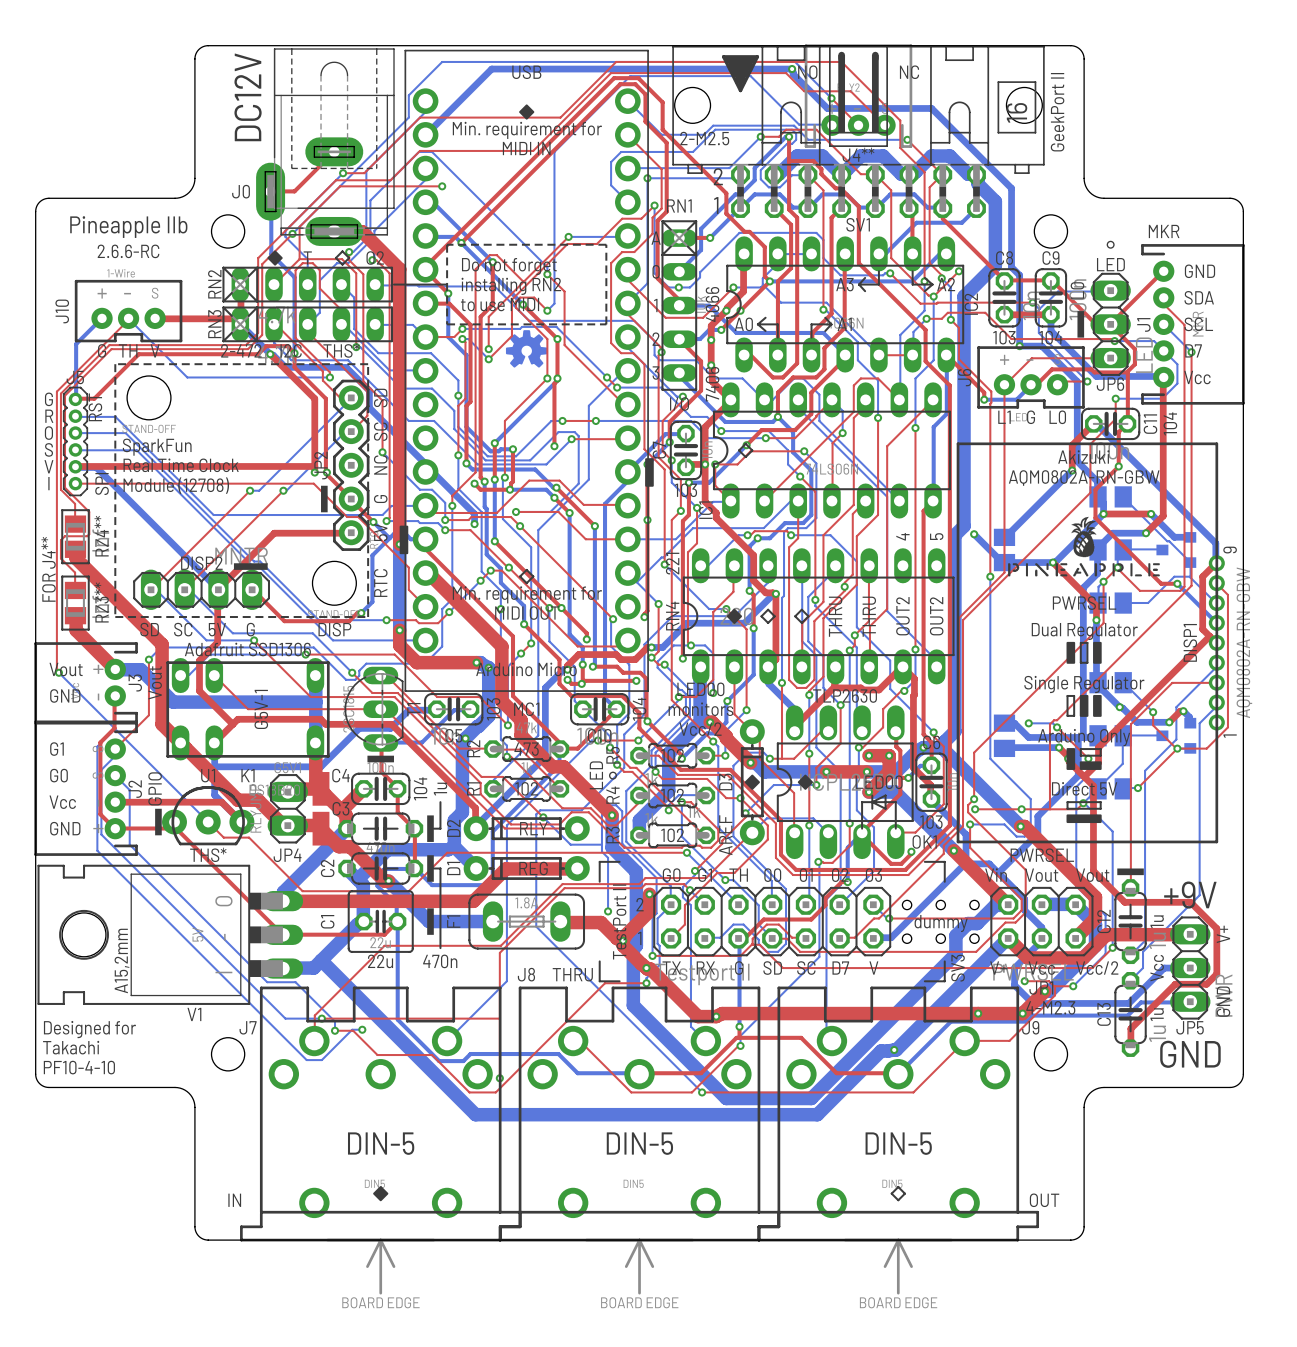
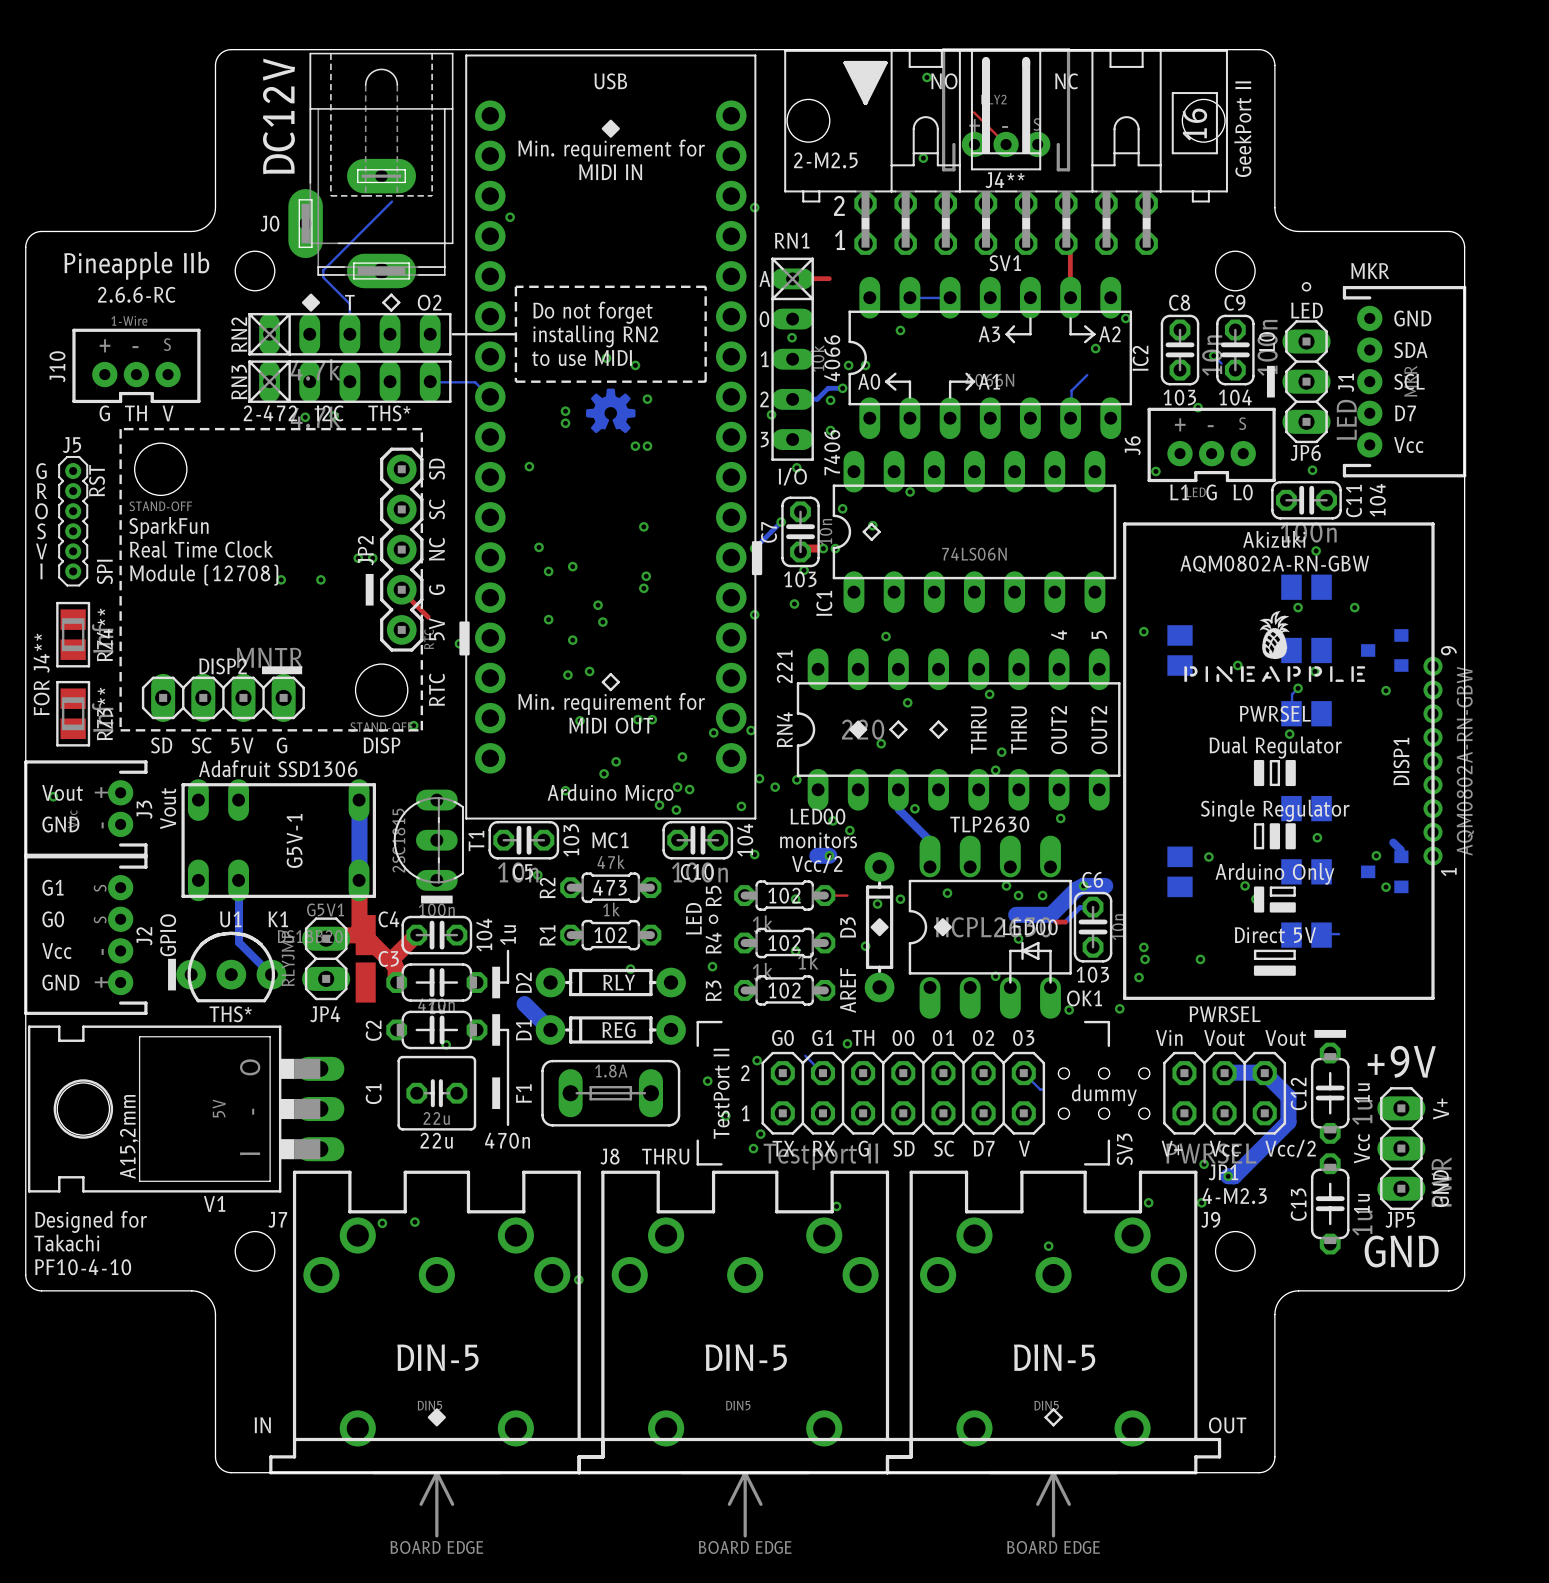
bottom track: (831, 98) (795, 61) (442, 61) (408, 95) (408, 117) (292, 233) -> none
via: (831, 98) -> none
bottom track: (425, 101) (425, 112) (366, 171) (366, 238) (353, 252) (349, 252) -> none
bottom track: (627, 101) (661, 134) (704, 134) (713, 125) (794, 125) (808, 139) (907, 139) -> none
bottom track: (831, 125) (799, 124) (750, 76) (630, 76) (554, 151) (554, 303) (547, 310) -> none
top track: (885, 125) (850, 91) (804, 91) (786, 73) (611, 73) (533, 150) (419, 150) (390, 180) (336, 180) (258, 258) (258, 332) (246, 345) (109, 345) (60, 393) (60, 489) (75, 503) (75, 524) -> none
bottom track: (425, 134) (491, 69) (792, 69) (793, 74) (827, 108) (931, 108) (1011, 188) (1011, 267) (1019, 275) (1019, 346) (1041, 346) (1077, 381) (1077, 461) (1097, 481) (1098, 496) (1103, 502) (1103, 514) (1053, 562) (1001, 561) (974, 534) -> none
top track: (627, 134) (661, 169) (661, 208) (652, 217) (652, 233) (634, 252) (622, 252) (611, 263) (611, 343) (621, 353) (633, 353) (644, 364) (644, 449) (664, 469) (664, 564) -> none
top track: (760, 136) (778, 136) (786, 129) (816, 129) (860, 174) (875, 174) (891, 190) (891, 258) (928, 295) (933, 296) (958, 271) -> none
bottom track: (760, 136) (729, 168) (627, 168) -> none
via: (760, 136) -> none
top track: (789, 136) (789, 209) (797, 217) (797, 363) (783, 377) (772, 377) (750, 355) (744, 355) -> none
bottom track: (789, 136) (786, 136) (754, 168) (754, 180) (740, 194) (735, 194) (701, 228) (701, 250) (679, 271) -> none
top track: (907, 139) (942, 174) (929, 187) (929, 263) (941, 275) (941, 278) -> none
via: (907, 139) -> none
top track: (334, 151) (294, 191) (270, 191) -> none
top track: (789, 161) (813, 161) (821, 169) (821, 174) (835, 188) (840, 188) (858, 206) (858, 263) (925, 329) (925, 361) (949, 385) (949, 825) (905, 869) (796, 869) (780, 854) (780, 820) (730, 769) (680, 769) (639, 728) (639, 713) (622, 696) (571, 696) (559, 683) (559, 659) (524, 624) -> none
bottom track: (425, 168) (425, 180) (374, 230) (374, 258) (372, 260) -> none
top track: (343, 173) (364, 173) (419, 117) (560, 117) (616, 61) (841, 61) (900, 120) (900, 147) (924, 172) (924, 281) -> none
via: (343, 173) -> none
bottom track: (740, 174) (736, 178) (647, 178) (647, 283) (627, 303) -> none
bottom track: (774, 174) (778, 174) (797, 156) (822, 156) (841, 174) (860, 156) (883, 156) (901, 174) (909, 174) (915, 172) (931, 156) (949, 156) (968, 174) (976, 174) (978, 184) (995, 201) (995, 265) (964, 296) (964, 526) (954, 535) (954, 731) (941, 747) (1020, 826) -> none
top track: (807, 174) (823, 190) (823, 309) -> none
bottom track: (807, 174) (792, 175) (779, 187) (768, 187) (760, 179) (760, 170) (787, 143) (792, 143) (796, 139) (796, 133) (792, 129) (715, 129) (693, 151) (621, 151) (611, 162) (611, 185) (627, 202) -> none
top track: (442, 186) (340, 186) (299, 226) (299, 259) -> none
bottom track: (270, 191) (271, 254) (294, 277) (294, 353) -> none
bottom track: (425, 202) (433, 202) (492, 262) -> none
top track: (654, 205) (641, 218) (622, 218) (596, 243) (567, 243) (511, 299) (511, 336) (488, 359) -> none
bottom track: (654, 205) (654, 273) (668, 287) (689, 287) (700, 277) (700, 272) (739, 232) (816, 232) (823, 239) (823, 258) (840, 275) (883, 275) (890, 273) -> none
via: (654, 205) -> none
top track: (774, 208) (791, 224) (791, 268) (777, 281) (777, 355) -> none
top track: (841, 208) (831, 217) (831, 313) (812, 332) (811, 355) -> none
top track: (942, 208) (942, 218) (1004, 280) (1053, 281) (1095, 323) (1110, 324) -> none
bottom track: (942, 208) (927, 207) (914, 194) (890, 194) (875, 208) (859, 207) (846, 194) (822, 194) (807, 208) (793, 207) (779, 194) (754, 194) (710, 237) -> none
bottom track: (976, 208) (962, 222) (916, 222) (886, 253) (878, 253) -> none
top track: (334, 231) (362, 231) (399, 269) (399, 544) -> none
top track: (292, 233) (262, 264) (262, 335) (248, 349) (111, 349) (65, 395) (65, 487) (89, 511) (89, 534) (87, 536) (65, 536) (60, 540) (60, 558) (75, 572) (75, 590) -> none
via: (292, 233) -> none
bottom track: (425, 235) (455, 236) (523, 304) -> none
bottom track: (627, 235) (568, 236) -> none
top track: (568, 236) (488, 316) (488, 349) -> none
via: (568, 236) -> none
via: (710, 237) -> none
top track: (461, 242) (620, 84) (635, 84) (645, 94) (645, 121) (666, 142) (666, 211) (657, 220) (657, 278) (678, 299) (679, 305) -> none
via: (461, 242) -> none
top track: (349, 252) (349, 260) (363, 274) (363, 381) (382, 400) (382, 452) -> none
via: (349, 252) -> none
top track: (744, 253) (743, 291) (711, 325) (712, 381) (730, 399) (705, 427) (705, 501) (716, 512) (716, 518) (753, 555) (753, 580) (765, 592) (775, 593) (775, 659) (768, 666) -> none
bottom track: (777, 253) (777, 263) (762, 278) (762, 284) (780, 302) (826, 302) (878, 355) -> none
top track: (845, 253) (844, 327) (824, 348) (824, 369) (816, 377) (793, 377) (777, 392) (777, 416) -> none
bottom track: (946, 253) (939, 254) (912, 281) (769, 281) -> none
top track: (299, 259) (274, 284) -> none
top track: (299, 259) (342, 259) (356, 273) (356, 347) -> none
top track: (372, 260) (376, 260) (389, 273) (389, 518) (386, 521) -> none
via: (372, 260) -> none
top track: (492, 262) (492, 304) (480, 316) (480, 477) (484, 481) -> none
via: (492, 262) -> none
top track: (627, 269) (628, 280) (665, 317) (703, 317) (733, 287) -> none
top track: (1163, 271) (1110, 324) -> none
top track: (890, 273) (920, 303) (1032, 302) -> none
via: (890, 273) -> none
top track: (547, 274) (564, 291) (564, 345) (623, 403) (627, 404) -> none
bottom track: (547, 274) (547, 267) (432, 151) (418, 151) (370, 200) (370, 240) (348, 263) (337, 263) (319, 280) (319, 312) (307, 324) -> none
via: (547, 274) -> none
bottom track: (941, 278) (950, 287) (950, 319) -> none
via: (941, 278) -> none
top track: (523, 281) (496, 255) (489, 255) (475, 269) (475, 472) (452, 495) (452, 505) -> none
bottom track: (924, 281) (924, 310) (900, 335) (899, 399) -> none
via: (924, 281) -> none
top track: (240, 284) (240, 324) (237, 318) (155, 318) -> none
bottom track: (341, 284) (354, 297) (354, 328) (378, 353) (431, 353) (458, 380) (458, 427) (487, 456) (516, 456) (551, 420) (562, 420) -> none
bottom track: (375, 284) (494, 286) (529, 320) (634, 320) (654, 341) (654, 355) (659, 360) (696, 360) (714, 378) (742, 378) (763, 399) (772, 399) (794, 378) (803, 378) (819, 394) (819, 420) (899, 500) -> none
bottom track: (763, 284) (760, 287) (733, 287) -> none
via: (733, 287) -> none
bottom track: (1110, 290) (1058, 291) (1038, 309) (1038, 332) (1087, 381) -> none
top track: (448, 293) (426, 271) (426, 266) (614, 78) (638, 78) (662, 102) (662, 129) (726, 193) (726, 213) (744, 231) (749, 231) (764, 247) (764, 276) (769, 281) (721, 329) -> none
bottom track: (448, 293) (448, 337) (466, 355) (466, 427) (490, 451) (512, 449) -> none
via: (448, 293) -> none
bottom track: (933, 296) (933, 360) (915, 378) (915, 428) -> none
top track: (1163, 297) (1164, 304) (1184, 324) (1184, 586) (1180, 590) (1139, 590) (1117, 567) (1103, 581) (1103, 623) (974, 752) (974, 799) (968, 805) (968, 812) (1025, 869) (1025, 912) (1015, 922) (1005, 922) (976, 951) (800, 951) (787, 938) (772, 938) -> none
top track: (425, 303) (449, 303) (470, 324) (470, 401) (466, 405) (466, 463) -> none
top track: (627, 303) (628, 314) (660, 347) (661, 352) (658, 355) (658, 457) (680, 479) (680, 510) (671, 520) (671, 700) (713, 741) -> none
top track: (523, 304) (557, 339) (557, 380) (554, 383) (554, 446) -> none
bottom track: (679, 305) (709, 305) (736, 332) (823, 332) (845, 355) -> none
bottom track: (823, 309) (857, 342) (857, 360) (878, 380) (878, 417) -> none
via: (823, 309) -> none
top track: (547, 310) (534, 297) (520, 297) (516, 301) (516, 307) (547, 339) (547, 378) (504, 420) (504, 477) -> none
top track: (1004, 314) (1050, 314) -> none
bottom track: (1050, 314) (1050, 330) (1096, 376) (1163, 377) -> none
bottom track: (102, 318) (76, 344) (75, 399) -> none
top track: (128, 318) (56, 391) (56, 670) (58, 672) -> none
bottom track: (128, 318) (187, 377) (329, 377) -> none
top track: (926, 318) (941, 318) (947, 312) (985, 312) (1011, 339) (1112, 339) (1114, 341) -> none
via: (926, 318) -> none
top track: (950, 319) (958, 327) (958, 359) (991, 391) (990, 576) -> none
via: (950, 319) -> none
bottom track: (240, 324) (285, 367) (346, 367) (369, 390) (369, 407) (425, 463) (426, 472) (433, 472) (474, 514) (474, 524) -> none
top track: (274, 324) (322, 371) (322, 380) (340, 397) (351, 397) -> none
bottom track: (274, 324) (274, 343) (291, 360) (348, 360) (408, 420) (434, 420) (477, 464) (546, 464) (571, 439) -> none
top track: (307, 324) (308, 332) (367, 391) (367, 415) (351, 431) -> none
top track: (341, 324) (341, 309) (319, 288) (319, 270) (312, 263) (302, 263) (295, 270) (295, 338) (329, 372) (329, 377) -> none
bottom track: (341, 324) (389, 370) (425, 370) -> none
top track: (1110, 324) (1134, 349) (1134, 364) (1127, 371) (1127, 421) (1118, 432) (1118, 466) (1095, 489) (1095, 518) (1161, 583) (1177, 583) -> none
bottom track: (1163, 324) (1191, 352) -> none
top track: (462, 328) (454, 337) (425, 337) -> none
bottom track: (462, 328) (556, 326) (607, 377) -> none
via: (462, 328) -> none
bottom track: (627, 337) (628, 348) (676, 396) (682, 396) -> none
top track: (462, 339) (465, 342) (465, 398) (458, 405) (458, 455) -> none
bottom track: (462, 339) (468, 339) (488, 359) -> none
via: (462, 339) -> none
top track: (679, 339) (701, 361) (701, 390) (669, 421) (669, 442) -> none
bottom track: (1114, 341) (1154, 341) (1177, 364) (1177, 383) (1162, 398) (1115, 398) -> none
via: (1114, 341) -> none
bottom track: (356, 347) (360, 347) (401, 388) (432, 388) (454, 410) (454, 429) (485, 460) (530, 460) (558, 432) (574, 432) (578, 436) (578, 483) (550, 511) (516, 511) -> none
via: (356, 347) -> none
top track: (1191, 352) (1191, 585) (1057, 720) (1054, 720) (1049, 724) (1049, 809) -> none
via: (1191, 352) -> none
top track: (270, 354) (314, 398) (314, 472) -> none
top track: (845, 355) (844, 359) (811, 392) (811, 413) (795, 430) (761, 430) (746, 445) -> none
top track: (912, 355) (879, 355) -> none
top track: (946, 355) (984, 392) (984, 399) -> none
bottom track: (946, 355) (946, 413) (933, 427) (933, 501) -> none
top track: (1110, 358) (1031, 358) (1004, 384) (1004, 572) (958, 618) (958, 824) (908, 875) (793, 875) (775, 857) (775, 823) (727, 774) (677, 774) (658, 755) (638, 755) -> none
bottom track: (627, 370) (623, 371) (588, 405) (588, 479) (538, 530) (538, 735) (493, 779) (493, 788) -> none
bottom track: (679, 372) (679, 376) (725, 421) (772, 421) (777, 416) (793, 432) (793, 452) (811, 470) (811, 515) (803, 523) (785, 523) (769, 538) (757, 538) (749, 546) (749, 590) -> none
top track: (1127, 372) (1094, 372) (1091, 369) (1052, 369) (1036, 384) (1031, 384) -> none
via: (329, 377) -> none
top track: (607, 377) (617, 387) -> none
via: (607, 377) -> none
top track: (1163, 377) (1163, 516) (1146, 533) -> none
bottom track: (557, 378) (494, 443) -> none
top track: (1087, 381) (1061, 381) (1057, 384) -> none
via: (1087, 381) -> none
bottom track: (1031, 384) (1016, 399) (984, 399) -> none
bottom track: (617, 387) (661, 387) (690, 416) (707, 416) (721, 431) (768, 431) (788, 450) (788, 464) (800, 476) -> none
via: (617, 387) -> none
top track: (682, 396) (682, 400) (662, 420) (662, 451) (671, 460) -> none
bottom track: (351, 397) (259, 490) (250, 490) -> none
top track: (1115, 398) (1115, 418) (1090, 444) (1090, 492) (963, 620) (963, 826) (943, 845) (943, 853) (879, 918) (874, 918) (854, 937) (839, 938) -> none
top track: (75, 399) (94, 398) (138, 354) (258, 354) (266, 346) (287, 346) (294, 353) (294, 367) (325, 398) (325, 471) (351, 498) -> none
bottom track: (798, 399) (799, 408) (887, 496) (887, 611) (935, 659) (936, 666) -> none
top track: (831, 399) (795, 438) (765, 438) -> none
bottom track: (831, 399) (842, 410) (842, 433) -> none
top track: (865, 399) (864, 406) (853, 417) (853, 504) (823, 535) (823, 601) (802, 623) (801, 666) -> none
top track: (899, 399) (878, 378) (860, 378) (853, 385) (853, 411) (764, 501) -> none
top track: (933, 399) (887, 446) (887, 609) (869, 626) (869, 666) -> none
bottom track: (75, 416) (115, 416) (213, 515) (382, 515) (391, 505) (425, 505) -> none
top track: (878, 417) (878, 515) (856, 536) (856, 584) (823, 618) (823, 676) (809, 690) (809, 695) -> none
via: (878, 417) -> none
top track: (562, 420) (595, 420) -> none
via: (562, 420) -> none
bottom track: (595, 420) (690, 420) (708, 438) (765, 438) -> none
via: (595, 420) -> none
top track: (1093, 423) (1072, 445) (1072, 470) -> none
bottom track: (1093, 423) (1096, 423) (1215, 543) (1216, 563) -> none
top track: (915, 428) (915, 649) -> none
via: (915, 428) -> none
bottom track: (351, 431) (345, 432) (286, 490) (283, 490) -> none
bottom track: (75, 433) (125, 433) (254, 561) (260, 561) (318, 620) (386, 620) -> none
bottom track: (685, 433) (665, 434) (627, 471) (627, 481) (605, 503) (605, 698) (616, 709) -> none
top track: (842, 433) (832, 443) (831, 501) -> none
via: (842, 433) -> none
top track: (627, 438) (571, 439) -> none
via: (765, 438) -> none
via: (571, 439) -> none
top track: (494, 443) (494, 479) -> none
via: (494, 443) -> none
bottom track: (746, 445) (709, 482) (688, 482) -> none
bottom track: (75, 449) (136, 450) (252, 565) (258, 565) (332, 640) (425, 640) -> none
top track: (512, 449) (512, 481) (509, 489) (480, 489) (474, 483) -> none
via: (512, 449) -> none
top track: (804, 451) (750, 451) (737, 464) (715, 464) (715, 485) (730, 501) -> none
bottom track: (804, 451) (816, 463) (816, 518) (806, 528) (788, 528) (784, 532) (781, 682) -> none
via: (804, 451) -> none
bottom track: (382, 452) (419, 489) (432, 489) (445, 502) (445, 520) -> none
via: (382, 452) -> none
bottom track: (458, 455) (458, 488) (481, 511) (481, 571) (500, 590) (500, 739) (506, 745) (506, 756) -> none
via: (458, 455) -> none
bottom track: (671, 460) (671, 482) (697, 507) -> none
via: (671, 460) -> none
bottom track: (466, 463) (472, 469) (535, 469) (553, 487) (556, 487) -> none
top track: (647, 464) (647, 611) (644, 617) -> none
bottom track: (75, 466) (96, 467) (218, 589) -> none
top track: (314, 466) (75, 466) -> none
bottom track: (1072, 470) (1004, 537) -> none
via: (1072, 470) -> none
top track: (800, 476) (815, 491) (815, 599) -> none
via: (800, 476) -> none
bottom track: (504, 477) (502, 479) (502, 519) (531, 547) (531, 643) -> none
via: (504, 477) -> none
bottom track: (494, 479) (494, 541) -> none
bottom track: (484, 481) (486, 554) (500, 568) (500, 582) (524, 606) (524, 624) -> none
via: (484, 481) -> none
top track: (688, 482) (688, 515) (682, 521) (682, 658) -> none
top track: (75, 483) (313, 483) (347, 517) (358, 517) (408, 567) (408, 589) (425, 606) -> none
top track: (556, 487) (594, 526) -> none
bottom track: (509, 489) (546, 489) (554, 497) -> none
via: (509, 489) -> none
top track: (250, 490) (151, 589) -> none
top track: (283, 490) (184, 589) -> none
bottom track: (1123, 496) (1190, 562) (1190, 577) (1216, 603) -> none
top track: (554, 497) (569, 512) -> none
bottom track: (730, 501) (713, 501) (675, 539) (627, 539) -> none
top track: (798, 501) (798, 538) (789, 547) (789, 679) (797, 687) (806, 687) (814, 679) (814, 621) (844, 590) (844, 582) (852, 574) (852, 514) (865, 501) -> none
bottom track: (798, 501) (790, 501) (763, 528) (693, 528) (636, 582) -> none
top track: (933, 501) (923, 510) (923, 734) (931, 742) (931, 765) -> none
top track: (425, 505) (433, 512) (496, 512) (529, 480) (559, 480) (583, 504) (627, 505) -> none
bottom track: (452, 505) (452, 598) (442, 609) (442, 646) (425, 663) (366, 663) (359, 670) (359, 675) (355, 679) (346, 679) (313, 647) (161, 647) (148, 659) -> none
via: (452, 505) -> none
top track: (697, 507) (697, 543) (687, 552) (687, 642) (690, 645) -> none
via: (697, 507) -> none
top track: (516, 511) (558, 511) (585, 539) (627, 539) -> none
bottom track: (569, 512) (569, 634) (582, 647) (582, 664) -> none
via: (569, 512) -> none
top track: (1103, 514) (1151, 514) -> none
bottom track: (1151, 514) (1174, 537) (1190, 537) -> none
top track: (445, 520) (468, 520) (471, 517) (510, 517) (613, 619) -> none
via: (445, 520) -> none
bottom track: (386, 521) (438, 523) (445, 530) -> none
via: (386, 521) -> none
bottom track: (373, 522) (389, 538) -> none
via: (373, 522) -> none
bottom track: (594, 526) (594, 664) (592, 666) -> none
via: (594, 526) -> none
top track: (445, 530) (470, 530) (549, 608) -> none
via: (445, 530) -> none
top track: (351, 532) (274, 533) (218, 588) (217, 642) (199, 660) (199, 690) (232, 724) -> none
bottom track: (1146, 533) (1112, 533) (1098, 547) (1097, 573) (1083, 587) (1083, 737) -> none
via: (1146, 533) -> none
top track: (747, 535) (750, 535) (754, 531) (787, 531) (791, 535) -> none
bottom track: (747, 535) (738, 535) (708, 565) (700, 565) -> none
via: (747, 535) -> none
bottom track: (791, 535) (830, 535) (856, 561) (856, 627) (890, 660) (890, 688) (933, 732) -> none
via: (791, 535) -> none
top track: (425, 539) (426, 549) (512, 636) (512, 696) (560, 743) (560, 749) (577, 748) (616, 709) -> none
bottom track: (425, 539) (410, 539) (404, 533) (394, 533) (372, 555) (372, 601) (361, 613) -> none
top track: (494, 541) (586, 633) (586, 639) -> none
bottom track: (399, 544) (399, 630) -> none
top track: (75, 549) (76, 558) (162, 644) (162, 724) (237, 800) (258, 800) (281, 823) (287, 825) (314, 825) (321, 828) (339, 846) (350, 846) (384, 881) (388, 881) -> none
bottom track: (1162, 549) (1123, 549) (1117, 555) (1117, 567) -> none
top track: (1053, 562) (1096, 606) (1096, 620) -> none
top track: (1216, 563) (1202, 576) (1202, 629) (1216, 642) -> none
bottom track: (664, 564) (709, 609) (726, 609) -> none
via: (664, 564) -> none
top track: (734, 565) (733, 591) (713, 612) (713, 679) (696, 697) (678, 697) -> none
bottom track: (768, 565) (767, 582) (734, 616) (672, 616) (644, 644) (644, 714) (624, 734) (624, 767) (581, 810) (540, 810) (536, 814) (536, 926) (702, 1092) -> none
bottom track: (801, 565) (802, 641) (816, 655) (816, 747) (840, 771) (840, 885) (826, 899) (826, 1035) (831, 1041) -> none
bottom track: (835, 565) (834, 570) (808, 596) (808, 641) (823, 656) (823, 687) (840, 705) -> none
top track: (869, 565) (868, 621) (854, 635) (854, 645) (849, 650) -> none
top track: (425, 573) (429, 573) (501, 646) (501, 701) (521, 720) (521, 735) (552, 766) (563, 766) (612, 815) -> none
bottom track: (627, 573) (658, 604) -> none
bottom track: (990, 576) (990, 758) (1030, 799) (1030, 830) (1024, 836) (1016, 836) (1004, 824) (970, 824) -> none
via: (990, 576) -> none
bottom track: (1190, 576) (1174, 576) (1148, 602) (1123, 603) -> none
top track: (480, 580) (490, 570) (501, 570) (577, 646) (622, 646) (627, 640) -> none
bottom track: (480, 580) (449, 612) -> none
via: (480, 580) -> none
bottom track: (1177, 583) (1216, 622) -> none
top track: (1216, 583) (1227, 594) (1227, 727) (1206, 748) (1176, 748) (1153, 725) (1153, 712) -> none
bottom track: (151, 589) (156, 589) (206, 640) (254, 640) -> none
bottom track: (184, 589) (189, 589) (232, 633) (312, 633) (352, 672) -> none
top track: (252, 589) (284, 621) (349, 621) (357, 613) (361, 613) -> none
top track: (749, 590) (753, 594) (753, 628) -> none
via: (749, 590) -> none
bottom track: (775, 593) (744, 623) (686, 623) (662, 647) (651, 647) -> none
bottom track: (815, 599) (815, 606) (856, 647) (856, 726) (862, 731) -> none
via: (815, 599) -> none
top track: (658, 604) (658, 651) (651, 657) (658, 664) (664, 664) -> none
via: (658, 604) -> none
bottom track: (549, 608) (549, 641) (574, 666) (574, 701) (582, 709) -> none
top track: (726, 609) (746, 629) (746, 710) -> none
via: (726, 609) -> none
top track: (449, 612) (438, 623) (418, 623) (415, 620) (386, 620) -> none
via: (449, 612) -> none
top track: (75, 615) (76, 630) (115, 669) -> none
bottom track: (613, 619) (611, 621) (611, 646) (629, 664) (629, 713) (617, 725) (617, 764) -> none
via: (386, 620) -> none
bottom track: (1096, 620) (1096, 680) (1098, 685) (1136, 722) (1169, 722) -> none
via: (524, 624) -> none
bottom track: (753, 628) (753, 674) (726, 702) (726, 722) (715, 733) (707, 733) (681, 758) -> none
top track: (399, 630) (399, 645) (416, 662) (476, 662) -> none
via: (399, 630) -> none
top track: (1209, 636) (1098, 747) (1098, 762) (1084, 776) -> none
top track: (254, 640) (310, 697) (394, 697) (480, 782) (480, 794) (510, 824) (559, 824) (571, 812) (588, 812) (624, 847) (681, 847) (683, 845) (711, 847) (718, 840) (718, 829) (690, 802) (681, 802) -> none
via: (254, 640) -> none
top track: (531, 643) (521, 653) -> none
via: (690, 645) -> none
top track: (651, 647) (647, 647) (635, 659) (621, 659) (616, 654) (578, 654) (567, 665) (567, 669) -> none
via: (651, 647) -> none
bottom track: (915, 649) (915, 679) (904, 690) -> none
via: (915, 649) -> none
bottom track: (849, 650) (849, 823) -> none
bottom track: (521, 653) (507, 666) (507, 725) -> none
top track: (305, 654) (394, 654) (437, 697) (479, 697) (507, 725) -> none
bottom track: (305, 654) (209, 654) (189, 674) (180, 675) -> none
via: (305, 654) -> none
top track: (148, 659) (148, 715) (115, 749) -> none
via: (148, 659) -> none
bottom track: (476, 662) (480, 662) (488, 667) (488, 716) (465, 738) (462, 744) (462, 812) (454, 820) (454, 846) (448, 849) (387, 849) (357, 879) -> none
via: (476, 662) -> none
bottom track: (1216, 662) (1215, 667) (1176, 707) (1176, 739) (1145, 770) (1145, 940) (1130, 955) -> none
top track: (582, 664) (581, 683) -> none
bottom track: (664, 664) (689, 689) (689, 718) (655, 752) (655, 771) -> none
top track: (592, 666) (617, 666) (623, 672) (640, 672) (646, 678) (646, 720) (681, 755) (681, 758) -> none
bottom track: (700, 666) (700, 722) (668, 753) (668, 791) (639, 820) (638, 835) -> none
top track: (734, 666) (734, 714) (759, 739) (759, 758) (794, 793) (794, 832) -> none
bottom track: (115, 669) (140, 669) (173, 702) (315, 702) -> none
bottom track: (567, 669) (563, 669) (545, 687) (545, 756) (476, 825) (476, 828) -> none
via: (567, 669) -> none
bottom track: (58, 672) (208, 822) -> none
top track: (352, 672) (372, 692) (397, 692) (481, 776) (502, 776) (543, 817) -> none
via: (352, 672) -> none
top track: (214, 675) (248, 709) (380, 709) -> none
top track: (380, 675) (386, 675) (459, 748) (521, 749) (560, 788) -> none
top track: (567, 679) (571, 683) (581, 683) -> none
top track: (636, 680) (584, 680) (581, 683) -> none
top track: (781, 682) (781, 758) -> none
bottom track: (1123, 682) (1153, 712) -> none
top track: (1216, 682) (1172, 682) (1130, 724) (1130, 887) -> none
top track: (834, 686) (795, 726) (794, 731) -> none
top track: (834, 686) (879, 689) (902, 666) (914, 678) (913, 767) (930, 785) (931, 799) -> none
top track: (904, 690) (901, 690) (883, 709) (883, 727) (862, 747) (858, 747) -> none
bottom track: (713, 692) (713, 653) (705, 645) (673, 645) (657, 661) (657, 667) (685, 694) (685, 716) (651, 750) (651, 765) (626, 791) (626, 841) (670, 886) (671, 904) (657, 918) (659, 965) (646, 978) (646, 983) -> none
top track: (115, 695) (114, 728) (100, 742) (100, 814) (113, 827) (168, 828) (174, 822) (173, 825) (282, 934) (384, 934) (397, 921) -> none
bottom track: (809, 695) (809, 753) -> none
via: (809, 695) -> none
bottom track: (678, 697) (678, 700) (638, 740) -> none
via: (678, 697) -> none
bottom track: (1216, 702) (1215, 707) (1199, 723) (1199, 895) (1143, 951) (1143, 968) (1130, 980) -> none
top track: (840, 705) (840, 743) (816, 767) (816, 785) -> none
via: (840, 705) -> none
top track: (380, 709) (386, 710) (504, 828) (577, 828) -> none
bottom track: (436, 709) (408, 710) (390, 728) (359, 728) (320, 766) (214, 766) -> none
bottom track: (470, 709) (454, 710) (421, 742) (380, 742) -> none
bottom track: (582, 709) (610, 736) (610, 747) -> none
bottom track: (746, 710) (725, 731) (725, 755) -> none
via: (746, 710) -> none
top track: (1183, 711) (1180, 711) (1169, 722) -> none
via: (1183, 711) -> none
via: (1153, 712) -> none
top track: (710, 722) (750, 762) -> none
bottom track: (1004, 723) (1014, 723) (1028, 737) (1096, 737) (1098, 735) -> none
bottom track: (1028, 723) (1053, 723) (1057, 727) -> none
via: (507, 725) -> none
top track: (1057, 727) (1088, 758) -> none
via: (1057, 727) -> none
bottom track: (115, 728) (97, 746) (97, 850) (306, 1060) (321, 1060) (352, 1029) (362, 1029) -> none
top track: (828, 731) (820, 732) (794, 758) (769, 758) -> none
top track: (895, 731) (896, 746) (900, 750) (900, 794) (862, 832) (891, 863) (901, 863) (911, 851) -> none
top track: (933, 732) (933, 736) (943, 746) (943, 804) (915, 832) (895, 832) -> none
via: (933, 732) -> none
bottom track: (1162, 735) (1123, 735) (1122, 763) (1083, 803) (1112, 831) (1112, 947) -> none
bottom track: (1078, 737) (1078, 775) (1037, 816) (1037, 833) (998, 873) -> none
top track: (597, 740) (638, 740) -> none
bottom track: (597, 740) (591, 740) (506, 825) (506, 981) (447, 1040) -> none
via: (597, 740) -> none
via: (638, 740) -> none
bottom track: (713, 741) (718, 746) (718, 827) (771, 881) (772, 904) -> none
via: (713, 741) -> none
top track: (214, 742) (237, 719) (320, 719) (325, 724) (391, 724) (475, 808) (476, 828) -> none
top track: (380, 742) (381, 771) (397, 788) -> none
top track: (610, 747) (630, 767) (636, 767) (703, 834) (706, 835) -> none
via: (610, 747) -> none
bottom track: (858, 747) (856, 810) (874, 827) (874, 870) (839, 904) -> none
top track: (1059, 747) (1068, 756) (1069, 761) (1093, 786) (1093, 870) (1124, 902) (1190, 902) (1216, 928) (1216, 974) (1206, 984) (1175, 984) (1130, 1028) (1130, 1048) -> none
bottom track: (1059, 747) (1004, 748) -> none
top track: (1177, 748) (1137, 788) -> none
bottom track: (115, 749) (114, 756) (101, 769) (101, 834) (285, 1018) (321, 1018) -> none
bottom track: (560, 749) (559, 764) (492, 831) (492, 876) (483, 885) (432, 885) (414, 868) (384, 868) (377, 876) (377, 886) (396, 905) (397, 1019) (439, 1061) (463, 1061) (470, 1054) (558, 1054) (577, 1073) (639, 1074) -> none
top track: (809, 753) (809, 825) -> none
via: (725, 755) -> none
top track: (868, 755) (889, 755) (889, 771) (868, 792) -> none
top track: (506, 756) (510, 756) (562, 808) (590, 808) (608, 825) (616, 825) (638, 803) (638, 795) -> none
via: (506, 756) -> none
bottom track: (769, 758) (763, 752) (746, 752) (733, 765) (733, 836) (786, 889) (786, 943) (777, 951) (766, 951) (758, 943) (758, 939) (743, 924) (733, 924) (720, 937) (704, 938) -> none
bottom track: (1088, 758) (1088, 774) (1076, 787) (1076, 886) (1105, 915) (1105, 953) (1073, 986) -> none
via: (1088, 758) -> none
bottom track: (750, 762) (755, 762) (764, 771) (826, 771) -> none
top track: (617, 764) (624, 771) (632, 771) (668, 810) -> none
via: (617, 764) -> none
top track: (655, 771) (662, 778) (707, 778) (726, 798) (740, 798) (767, 825) (767, 839) (734, 873) (717, 873) (684, 905) (684, 924) (671, 938) -> none
via: (655, 771) -> none
top track: (826, 771) (866, 771) -> none
via: (826, 771) -> none
via: (866, 771) -> none
bottom track: (115, 775) (129, 790) (129, 844) (267, 982) (295, 982) (335, 1021) (335, 1030) -> none
via: (908, 777) -> none
bottom track: (816, 785) (773, 785) (745, 813) -> none
via: (816, 785) -> none
via: (1137, 788) -> none
top track: (397, 789) (397, 812) (414, 829) (414, 868) -> none
bottom track: (868, 792) (895, 792) (953, 850) -> none
bottom track: (706, 795) (678, 795) (668, 805) (668, 810) -> none
bottom track: (931, 799) (966, 834) (966, 862) -> none
top track: (115, 802) (221, 802) (241, 822) -> none
bottom track: (681, 802) (681, 836) (725, 880) (733, 880) (758, 905) (758, 924) (772, 938) -> none
top track: (1083, 803) (1077, 809) (975, 809) -> none
via: (1083, 803) -> none
via: (668, 810) -> none
top track: (745, 813) (745, 817) (695, 870) -> none
via: (745, 813) -> none
bottom track: (612, 815) (612, 847) (636, 871) (636, 945) (633, 948) (633, 1005) (726, 1098) (811, 1098) (955, 953) (955, 935) (968, 923) (977, 923) (995, 905) (1008, 904) -> none
bottom track: (543, 817) (570, 844) (601, 844) -> none
top track: (208, 822) (223, 837) (249, 837) (302, 891) (408, 891) (447, 852) (686, 852) -> none
top track: (849, 823) (849, 845) (832, 862) (818, 861) -> none
top track: (970, 824) (970, 847) (1021, 899) (1021, 910) (1013, 918) (889, 918) -> none
bottom track: (809, 825) (809, 901) (805, 904) -> none
via: (809, 825) -> none
top track: (1020, 826) (1024, 826) (1095, 897) (1095, 918) (1075, 938) -> none
via: (1020, 826) -> none
bottom track: (347, 828) (283, 892) (282, 901) -> none
top track: (752, 832) (706, 878) (645, 878) (639, 884) (562, 884) (500, 945) (384, 945) (314, 1015) (314, 1041) -> none
bottom track: (752, 832) (766, 818) (813, 818) (828, 832) -> none
bottom track: (862, 832) (847, 847) (847, 882) -> none
top track: (953, 850) (1008, 904) -> none
bottom track: (686, 852) (738, 904) -> none
via: (686, 852) -> none
bottom track: (818, 861) (819, 956) (740, 1035) (740, 1045) -> none
via: (818, 861) -> none
bottom track: (966, 862) (891, 937) (873, 938) -> none
bottom track: (966, 862) (989, 863) (1024, 899) (1024, 910) (1041, 927) (1040, 941) (1014, 968) (1014, 985) (1032, 1003) (1128, 1003) (1164, 968) (1190, 968) -> none
bottom track: (347, 868) (363, 885) (363, 921) (357, 924) (313, 968) (282, 968) -> none
top track: (577, 868) (505, 868) (473, 901) (282, 901) -> none
bottom track: (695, 870) (695, 875) (682, 887) (682, 897) (690, 905) (690, 1026) (705, 1041) -> none
via: (695, 870) -> none
bottom track: (388, 881) (429, 921) (492, 921) -> none
top track: (847, 882) (841, 882) (825, 898) (825, 905) (811, 919) (763, 919) (745, 937) (738, 938) -> none
via: (847, 882) -> none
top track: (689, 890) (683, 884) (645, 884) (641, 888) (564, 888) (499, 952) (499, 1078) -> none
via: (689, 890) -> none
top track: (649, 894) (649, 911) (626, 934) (623, 940) -> none
bottom track: (608, 911) (608, 857) (601, 851) (601, 811) (608, 805) (616, 805) (622, 811) (622, 843) (656, 878) (656, 913) (652, 917) (652, 955) -> none
via: (889, 918) -> none
top track: (560, 921) (600, 922) (617, 938) (623, 940) -> none
top track: (1190, 934) (1106, 934) (1083, 957) (1027, 957) (1008, 938) -> none
bottom track: (738, 938) (739, 1026) -> none
top track: (805, 938) (792, 937) (778, 924) (766, 924) (752, 938) (752, 943) (740, 955) (652, 955) -> none
bottom track: (1008, 938) (896, 1049) (881, 1050) (817, 1114) (475, 1114) (321, 960) -> none
top track: (623, 940) (623, 945) (641, 964) (650, 969) (698, 1016) (716, 1016) (722, 1013) (1022, 1013) (1044, 991) -> none
top track: (752, 944) (759, 944) (783, 968) (1092, 968) (1112, 947) -> none
via: (1112, 947) -> none
top track: (1024, 981) (1048, 981) (1055, 987) (1055, 995) (1009, 1040) (964, 1041) (913, 1092) (702, 1092) -> none
top track: (646, 983) (605, 983) (495, 1092) (469, 1092) (432, 1055) (377, 1055) (353, 1030) (335, 1030) -> none
via: (646, 983) -> none
top track: (1073, 986) (1054, 986) -> none
via: (1073, 986) -> none
bottom track: (1190, 1001) (1140, 1002) (1127, 1015) (1032, 1015) (1026, 1021) (950, 1021) (898, 1074) -> none
top track: (321, 1018) (499, 1018) -> none
via: (321, 1018) -> none
top track: (739, 1026) (739, 1037) -> none
via: (739, 1026) -> none
top track: (573, 1041) (580, 1041) (631, 1092) (691, 1092) (740, 1045) -> none
via: (740, 1045) -> none
top track: (639, 1074) (701, 1073) (736, 1037) (801, 1037) (836, 1073) (898, 1074) -> none
via: (702, 1092) -> none

